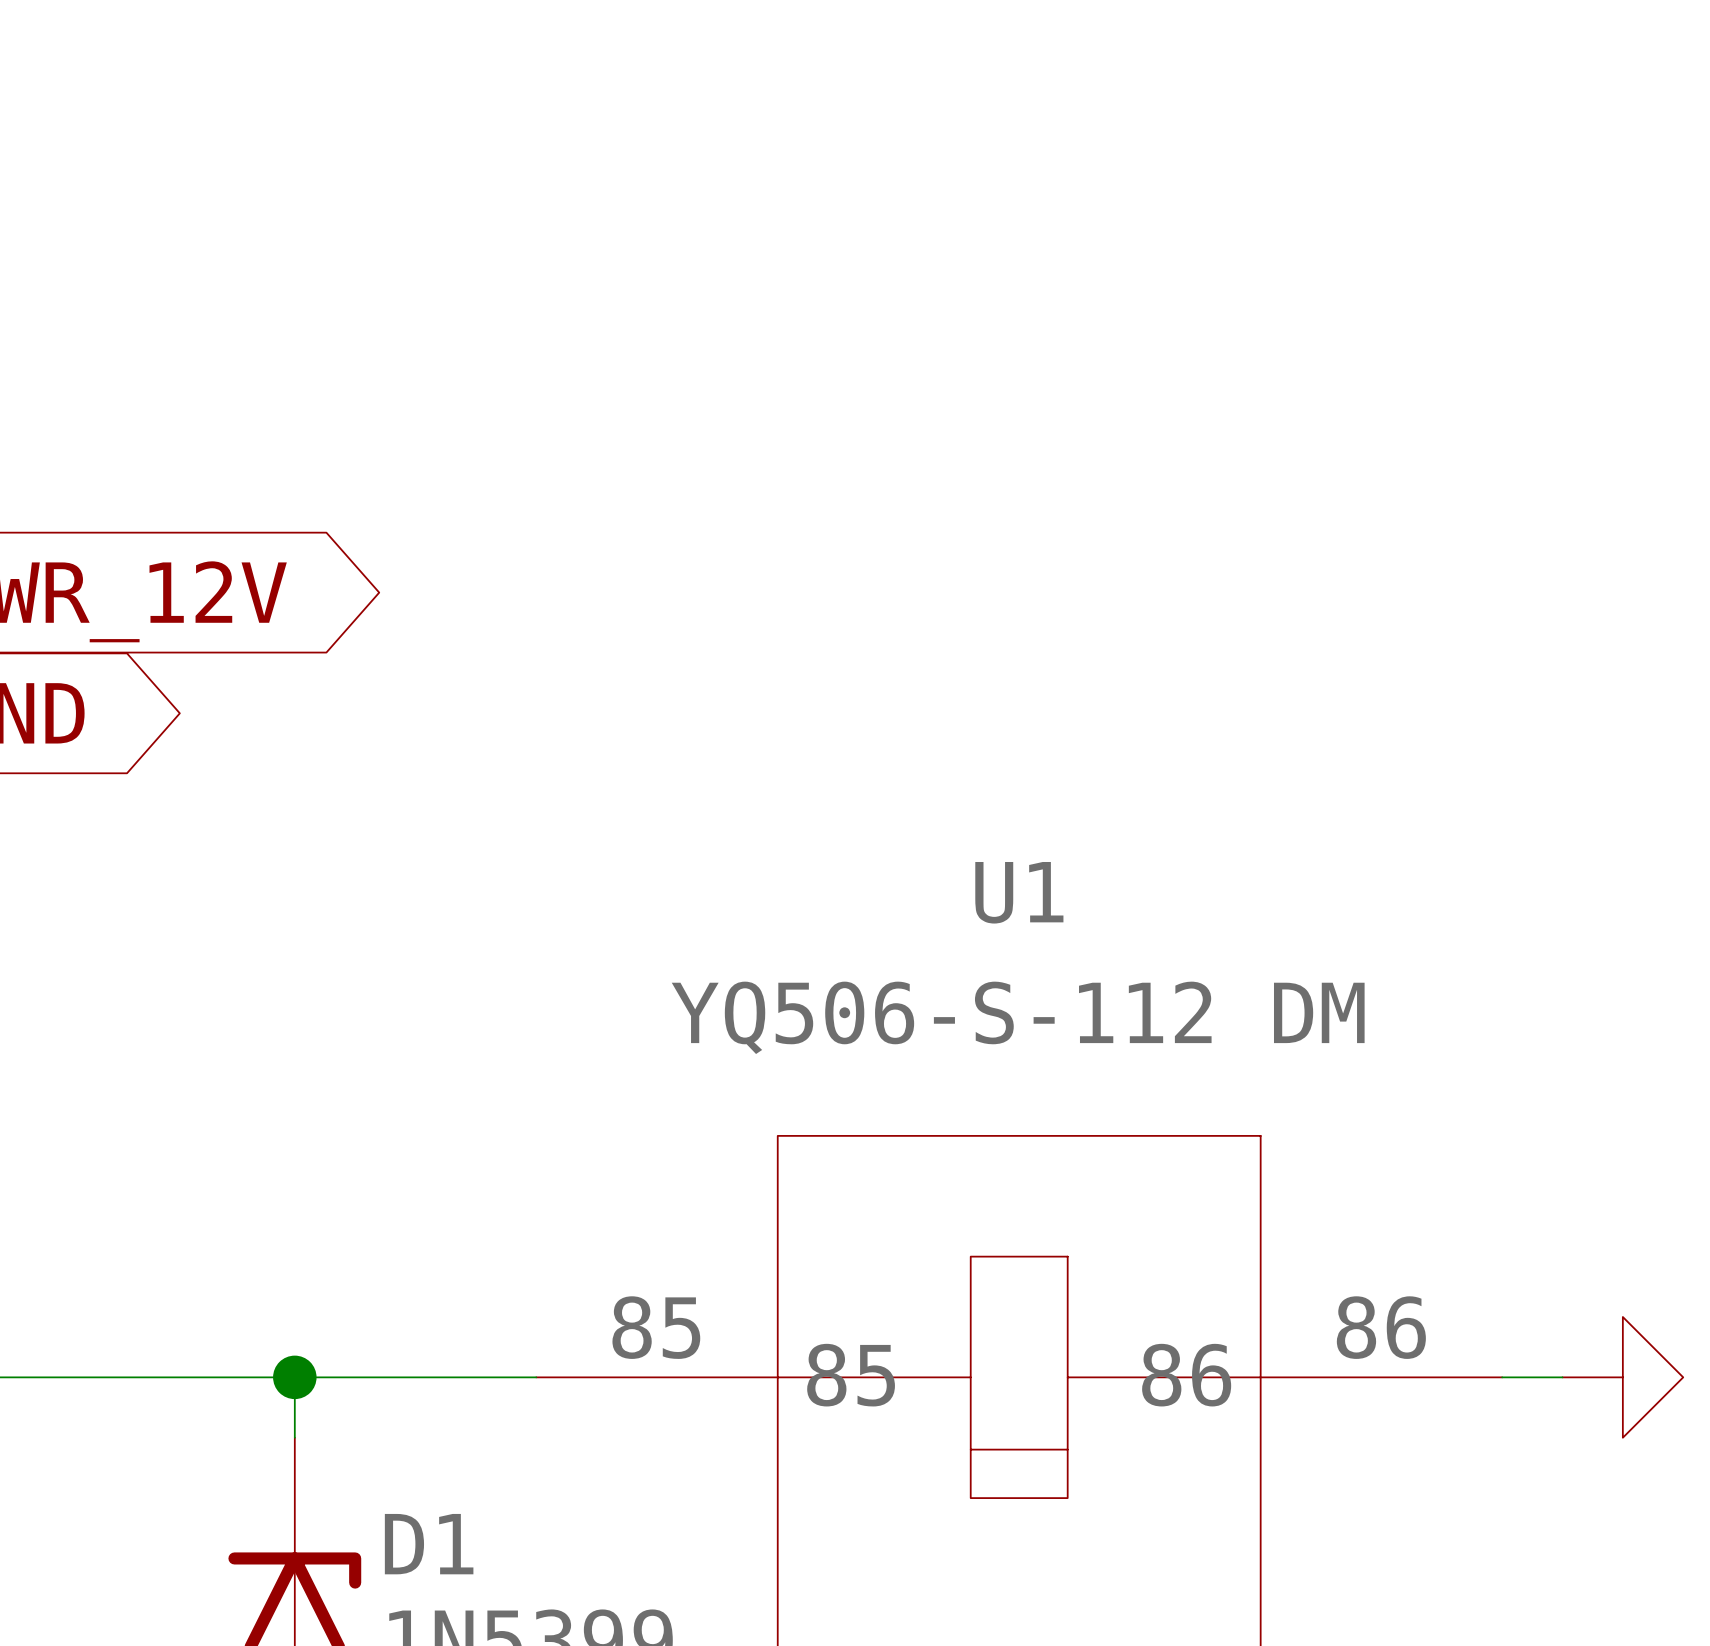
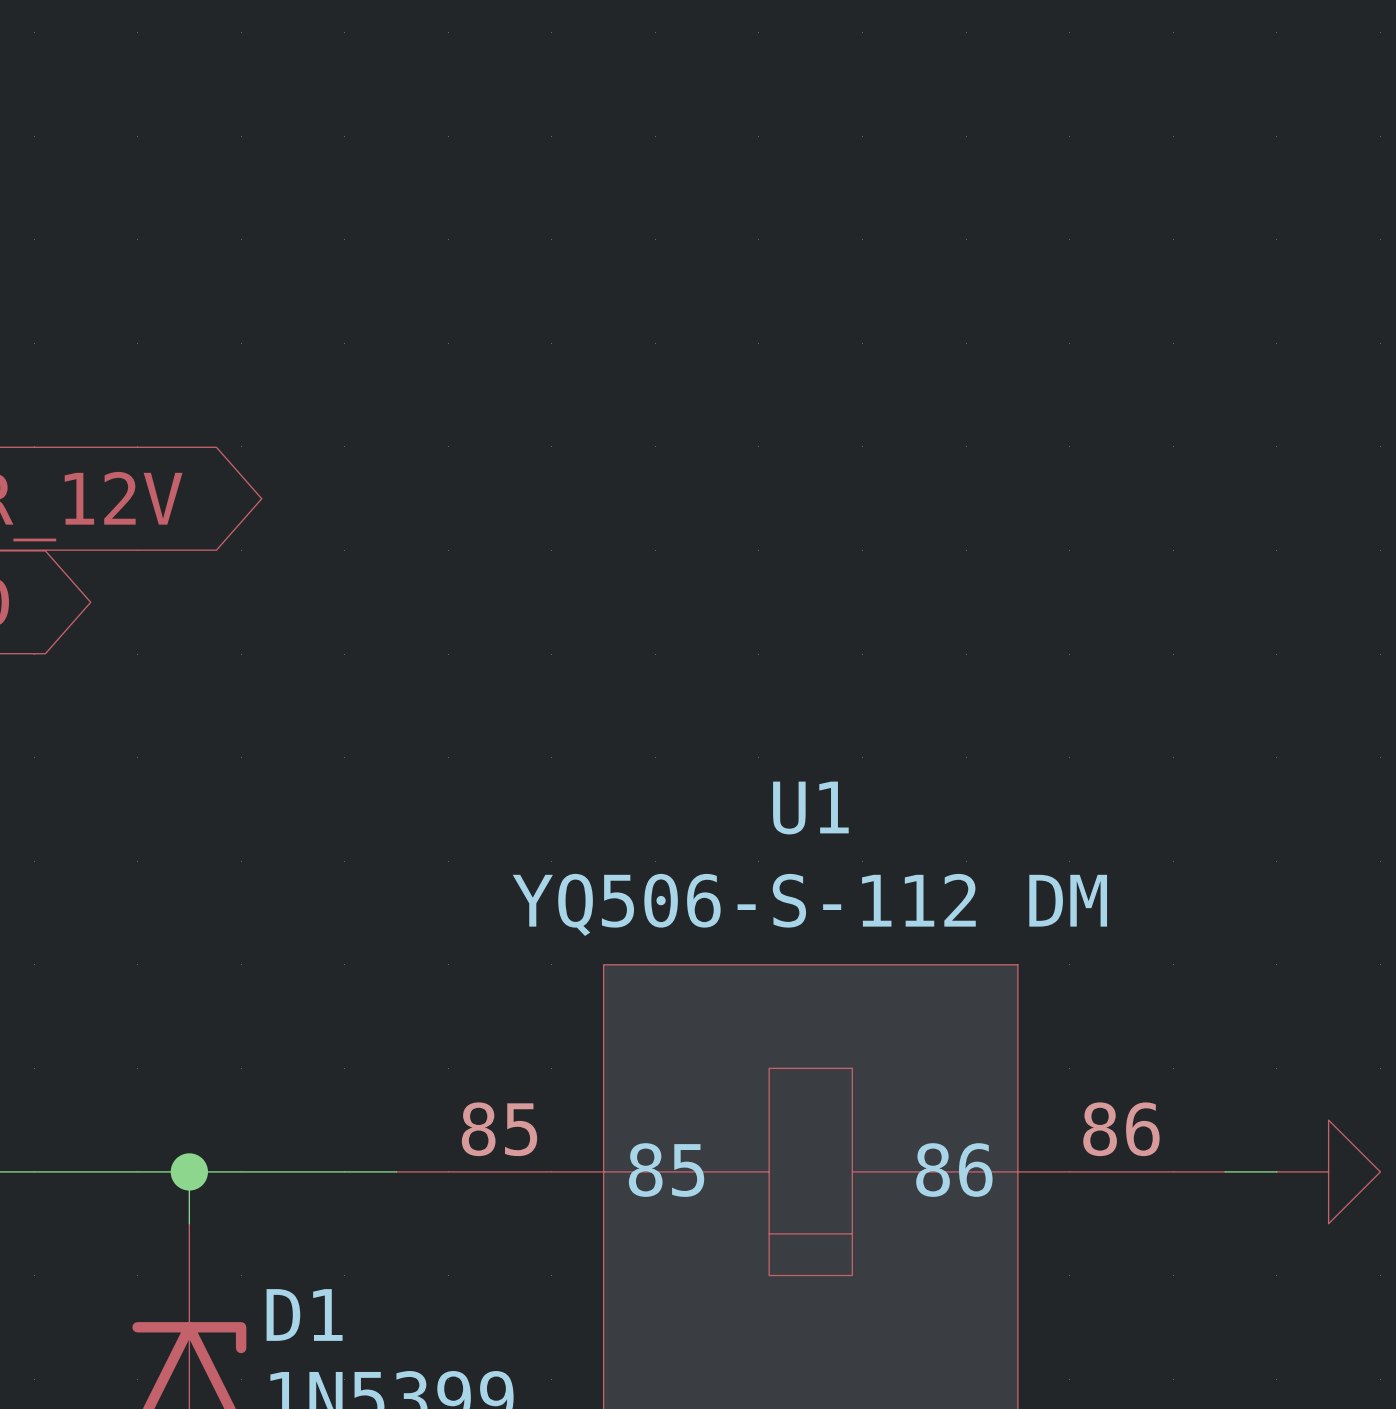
U1 name position: U1 (1019, 892) -> U1 (810, 808)
U1 value position: YQ506-S-112 DM (1018, 1017) -> YQ506-S-112 DM (809, 904)

